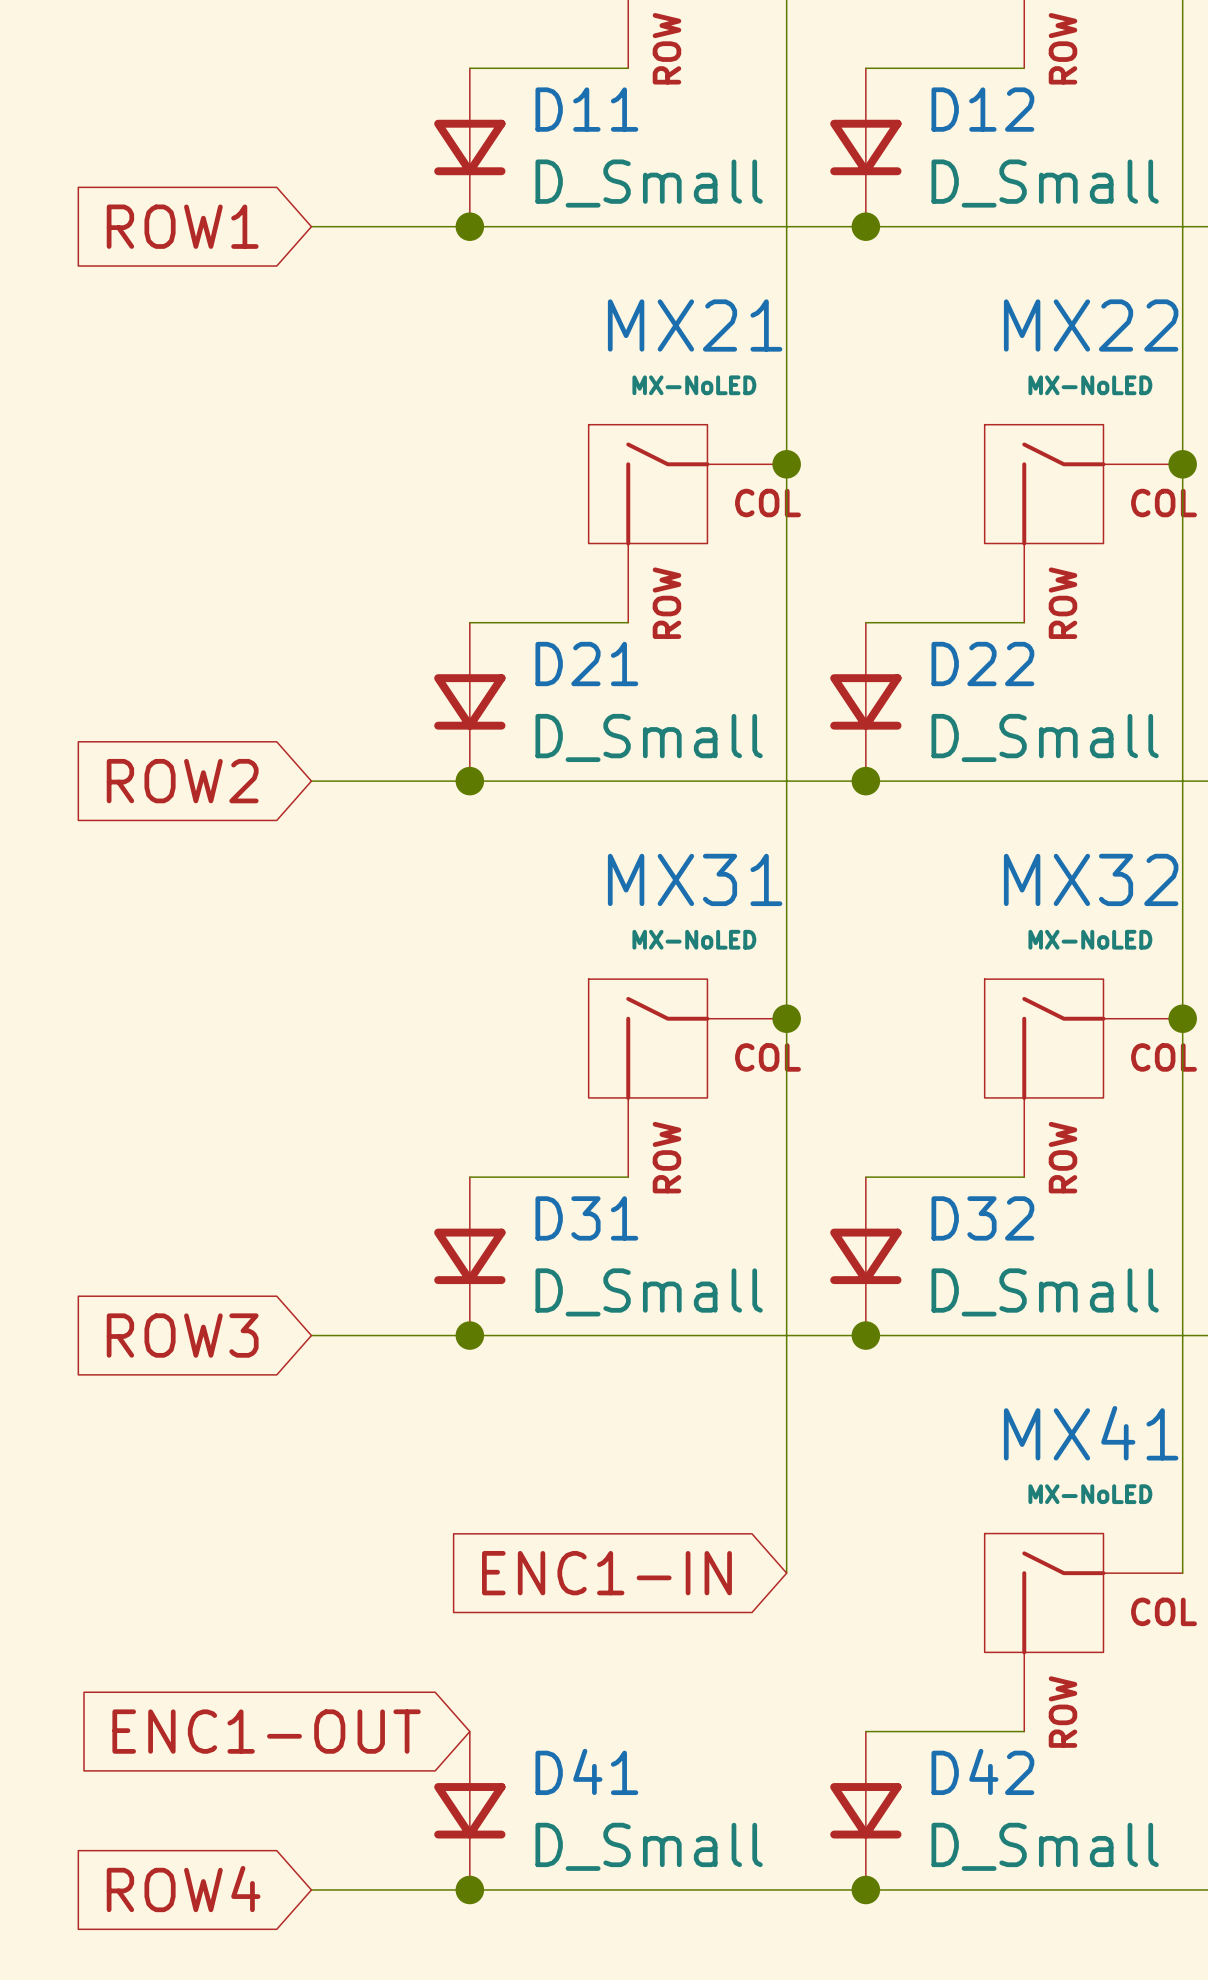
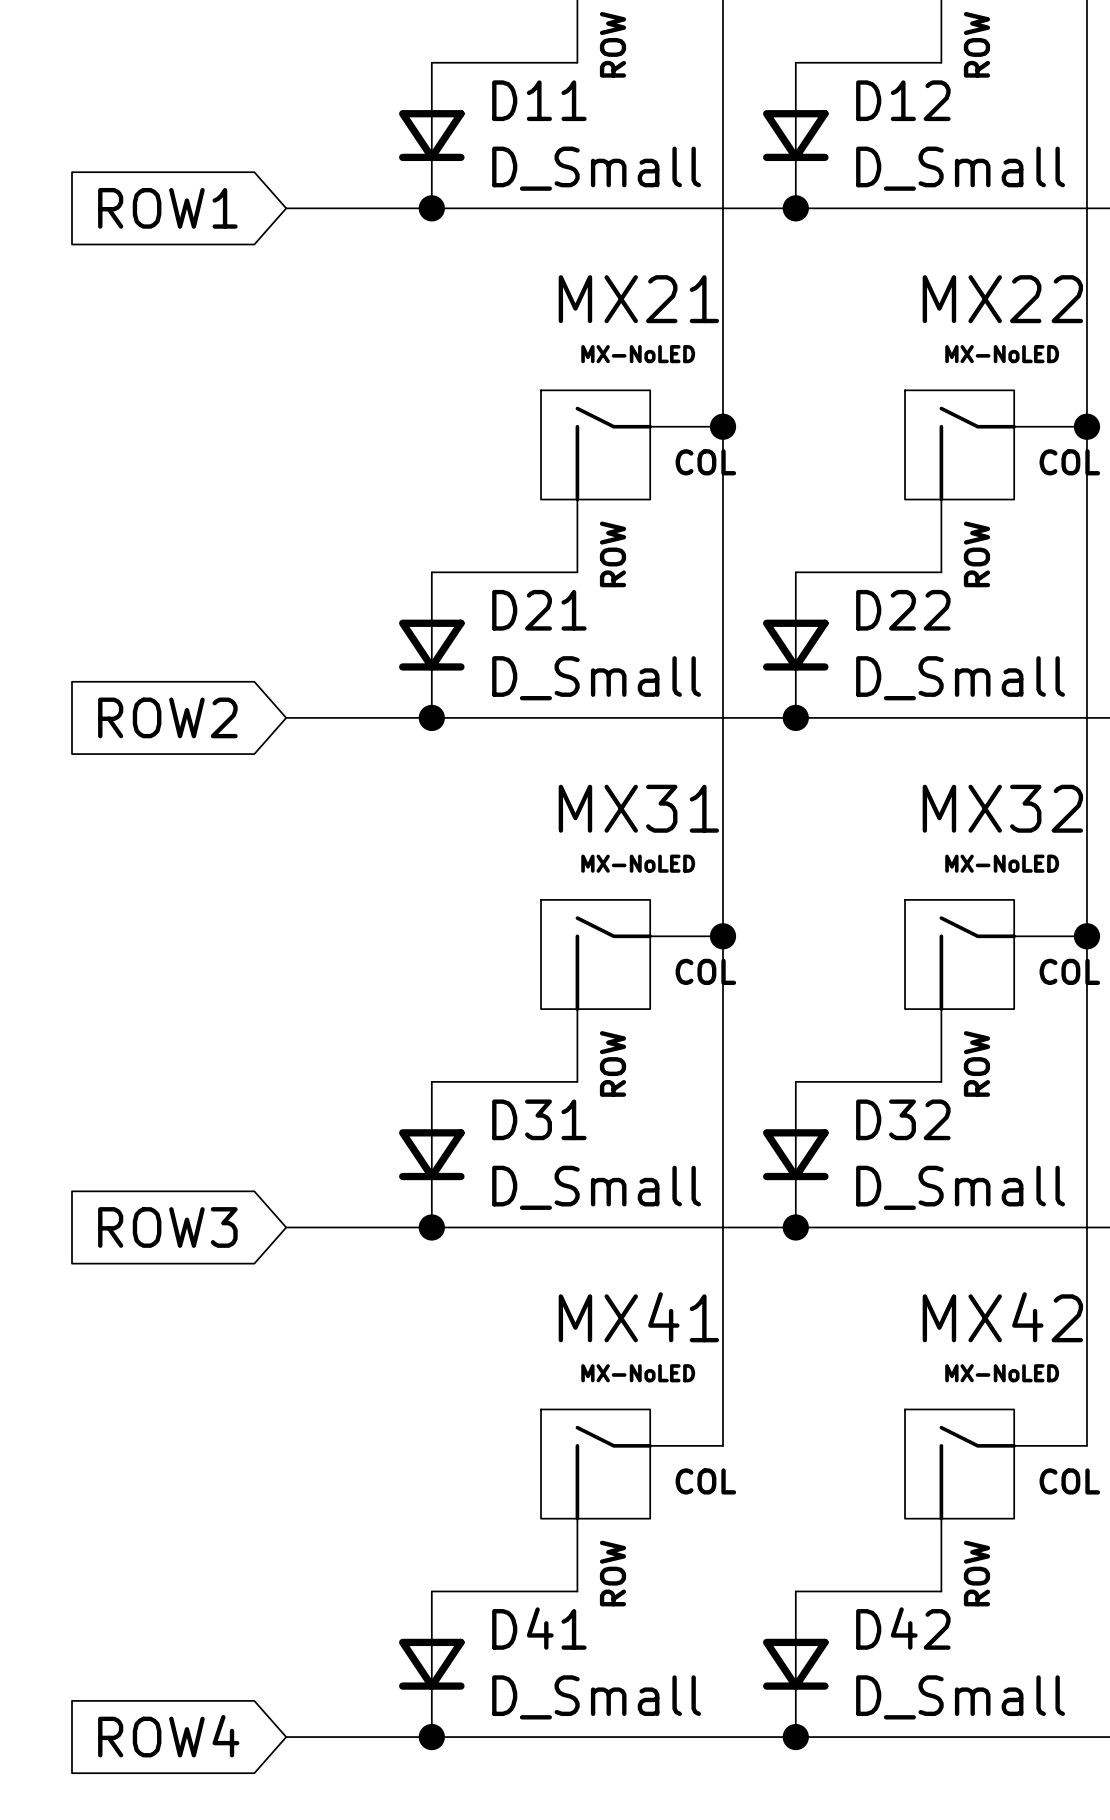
MX41 name: MX41 (1091, 1433) -> MX42 (1002, 1317)
global label: ENC1-IN (606, 1573) -> none
MX41: none -> MX-NoLED (632, 1500)
global label: ENC1-OUT (266, 1731) -> none
wire: none -> (431, 1591) (577, 1591)

